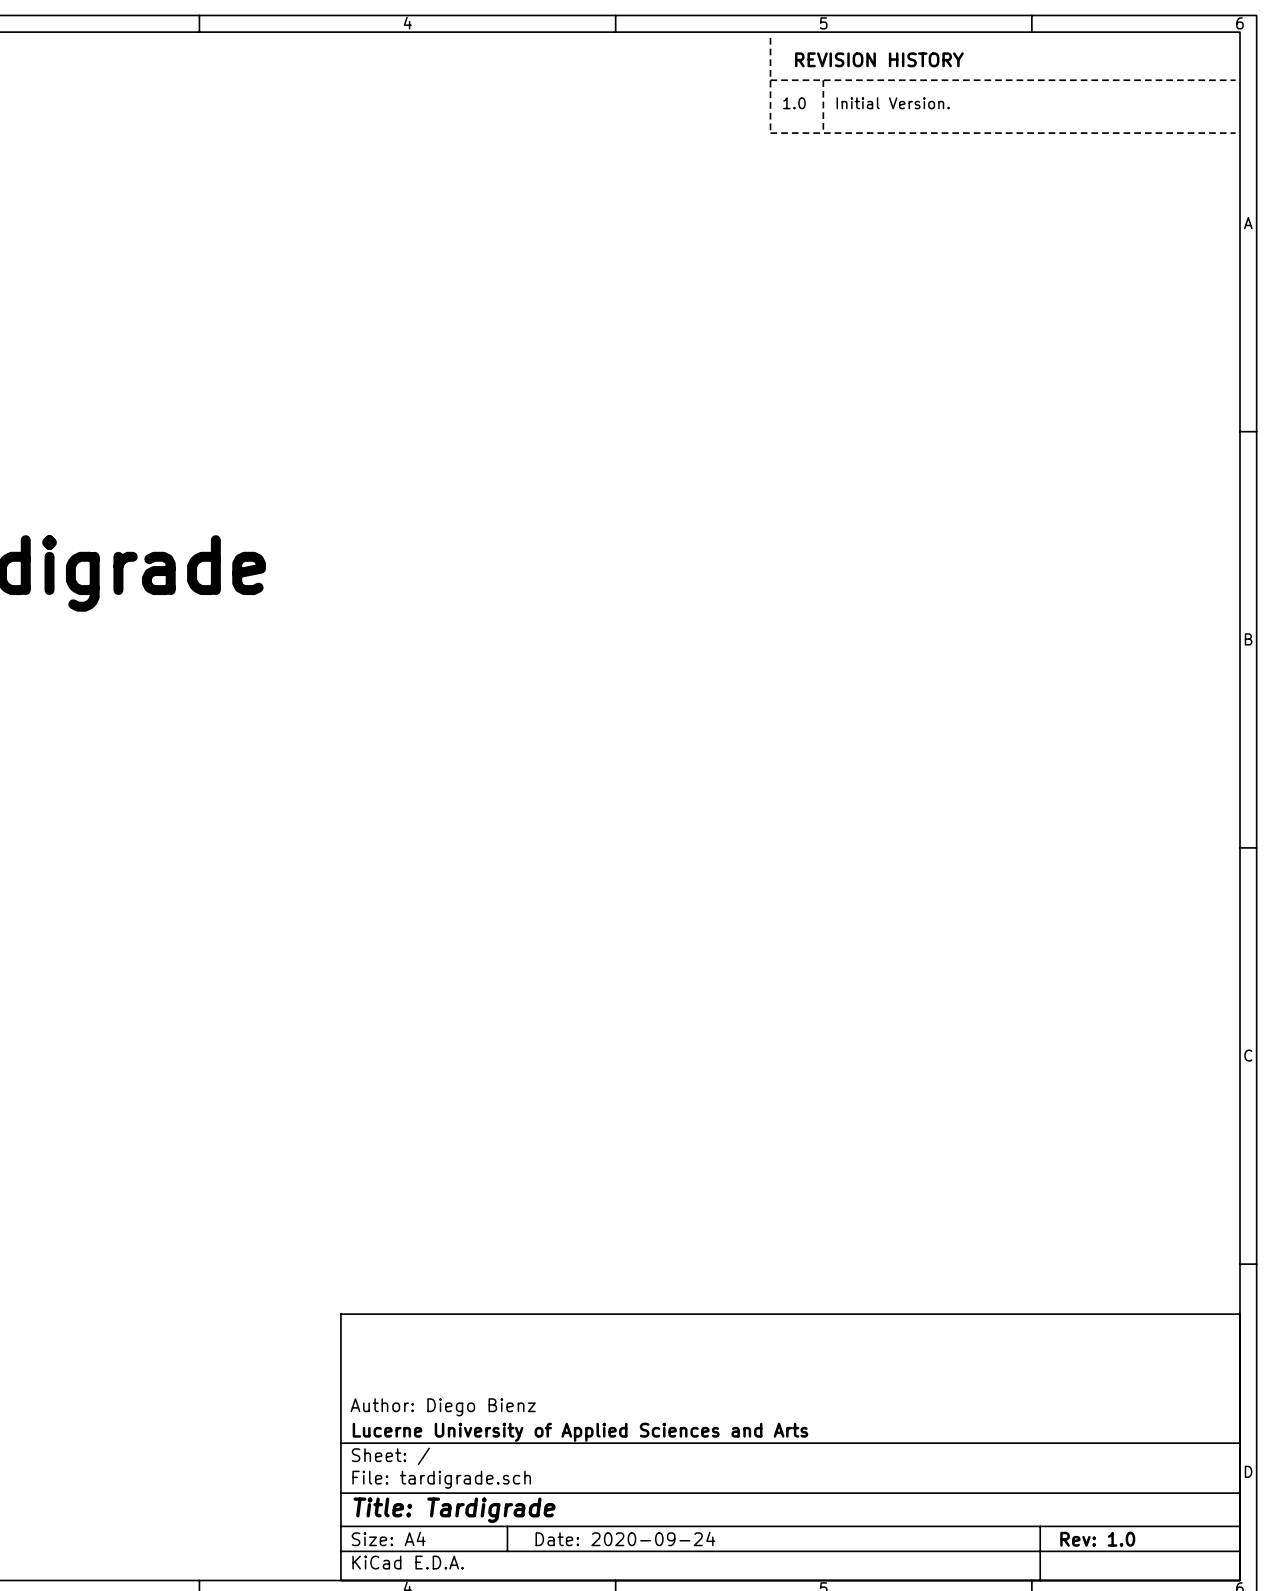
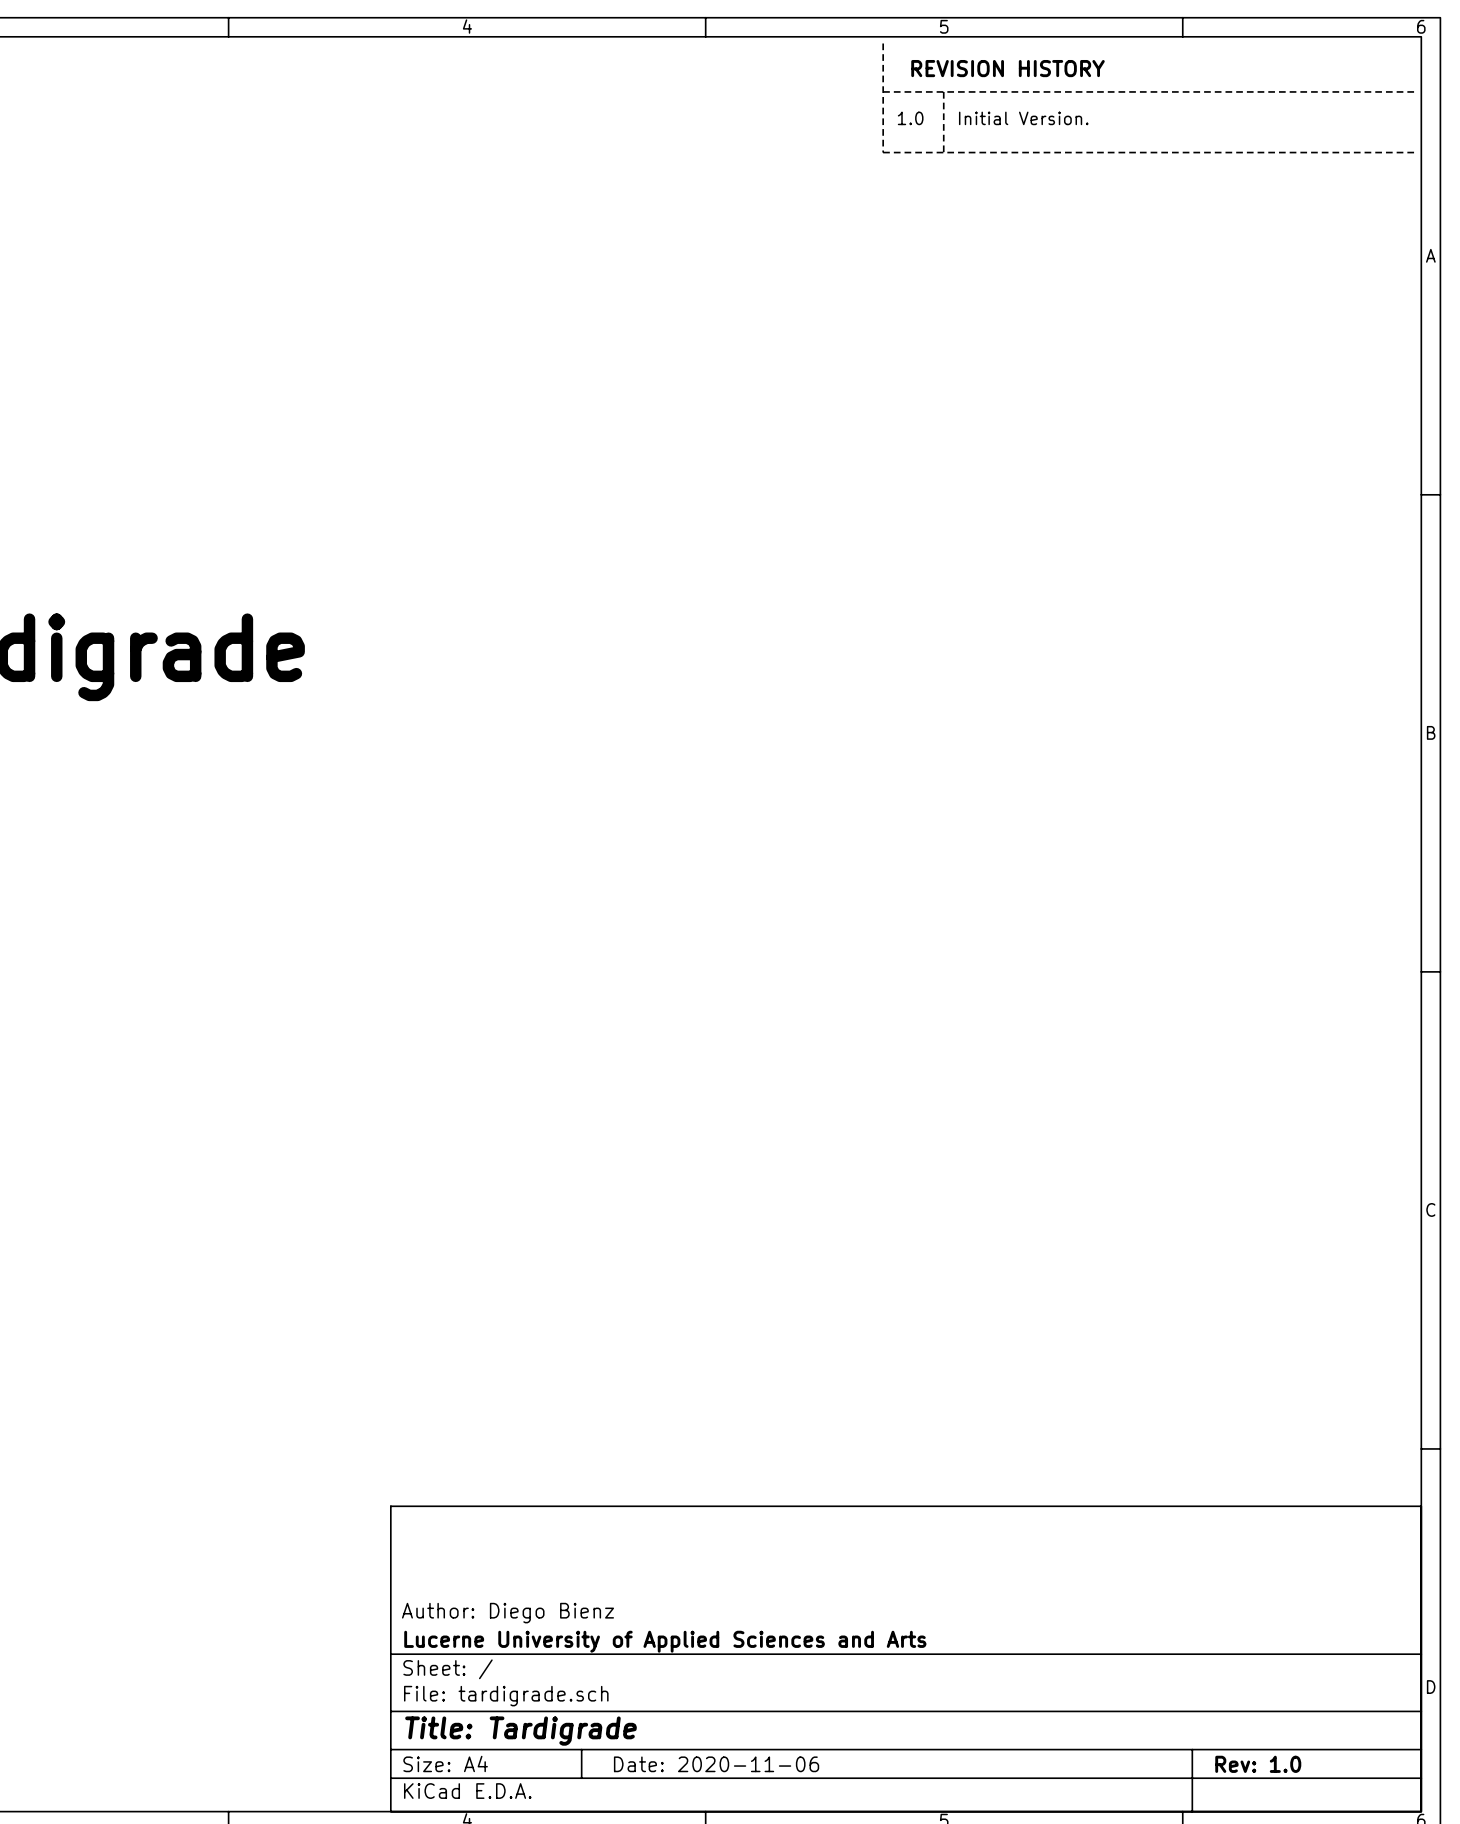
title block: Date: 2020-09-24 (625, 1538) -> Date: 2020-11-06 (716, 1764)

